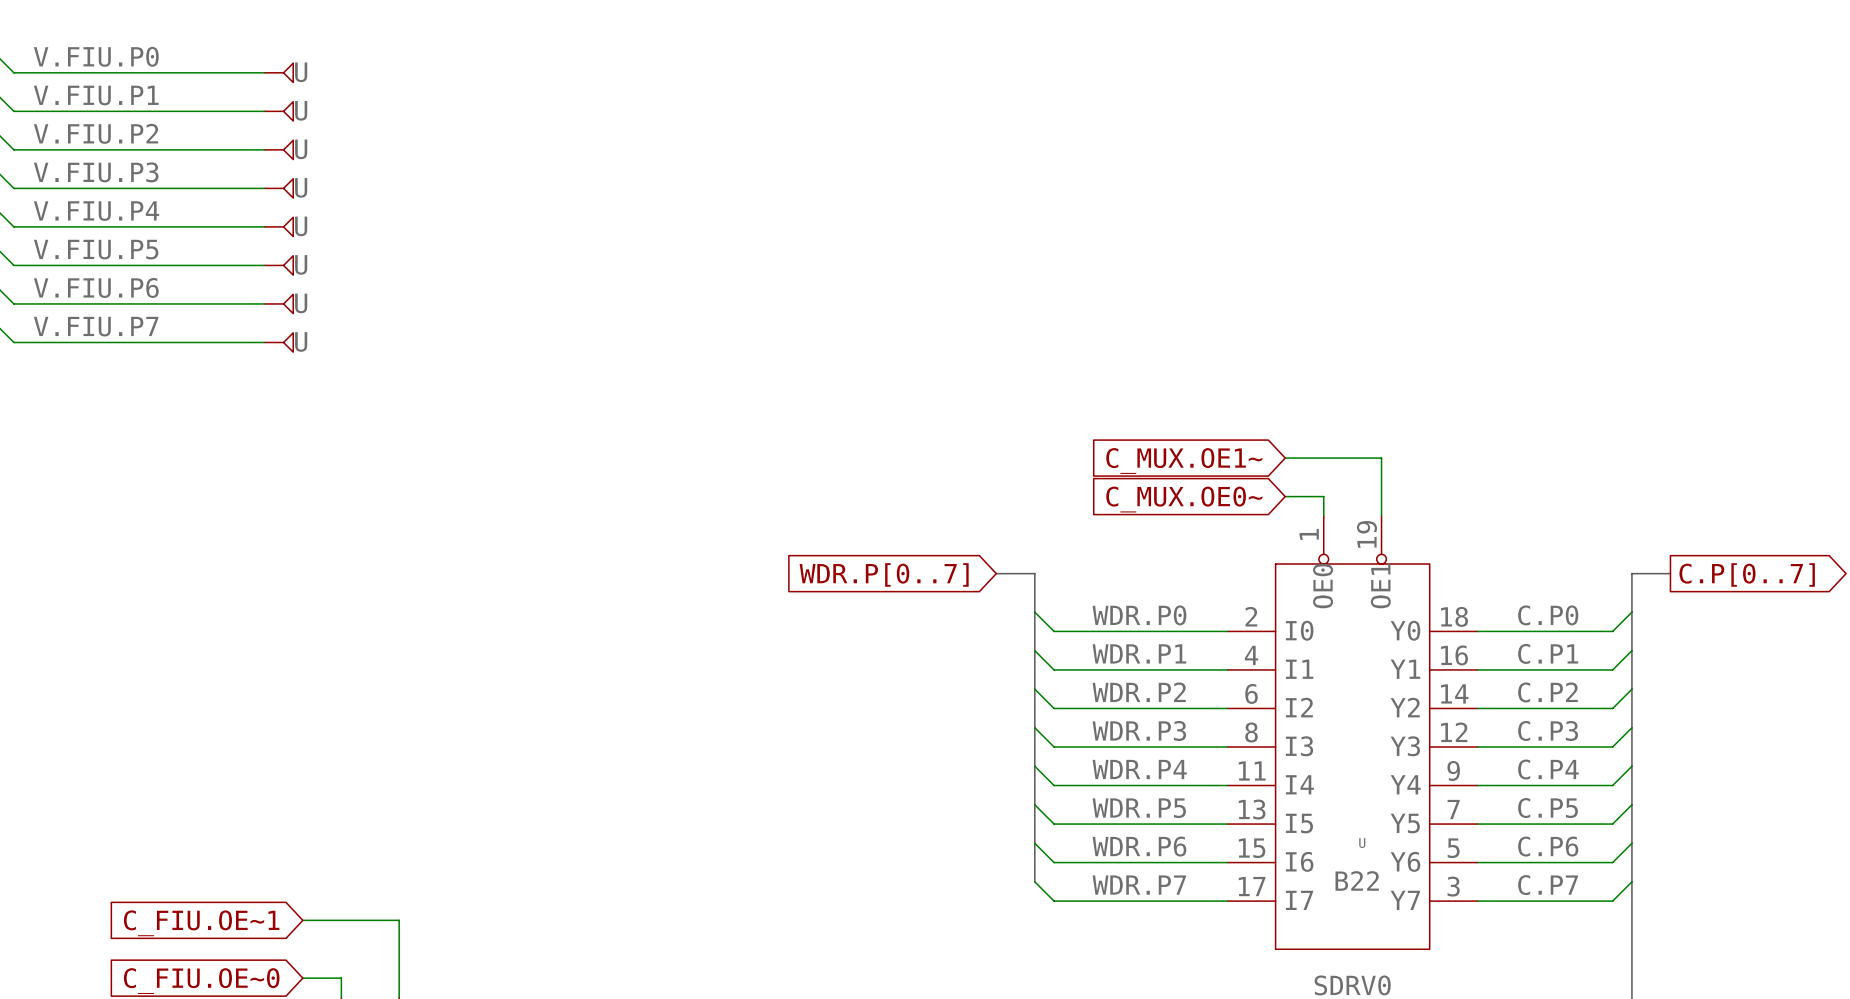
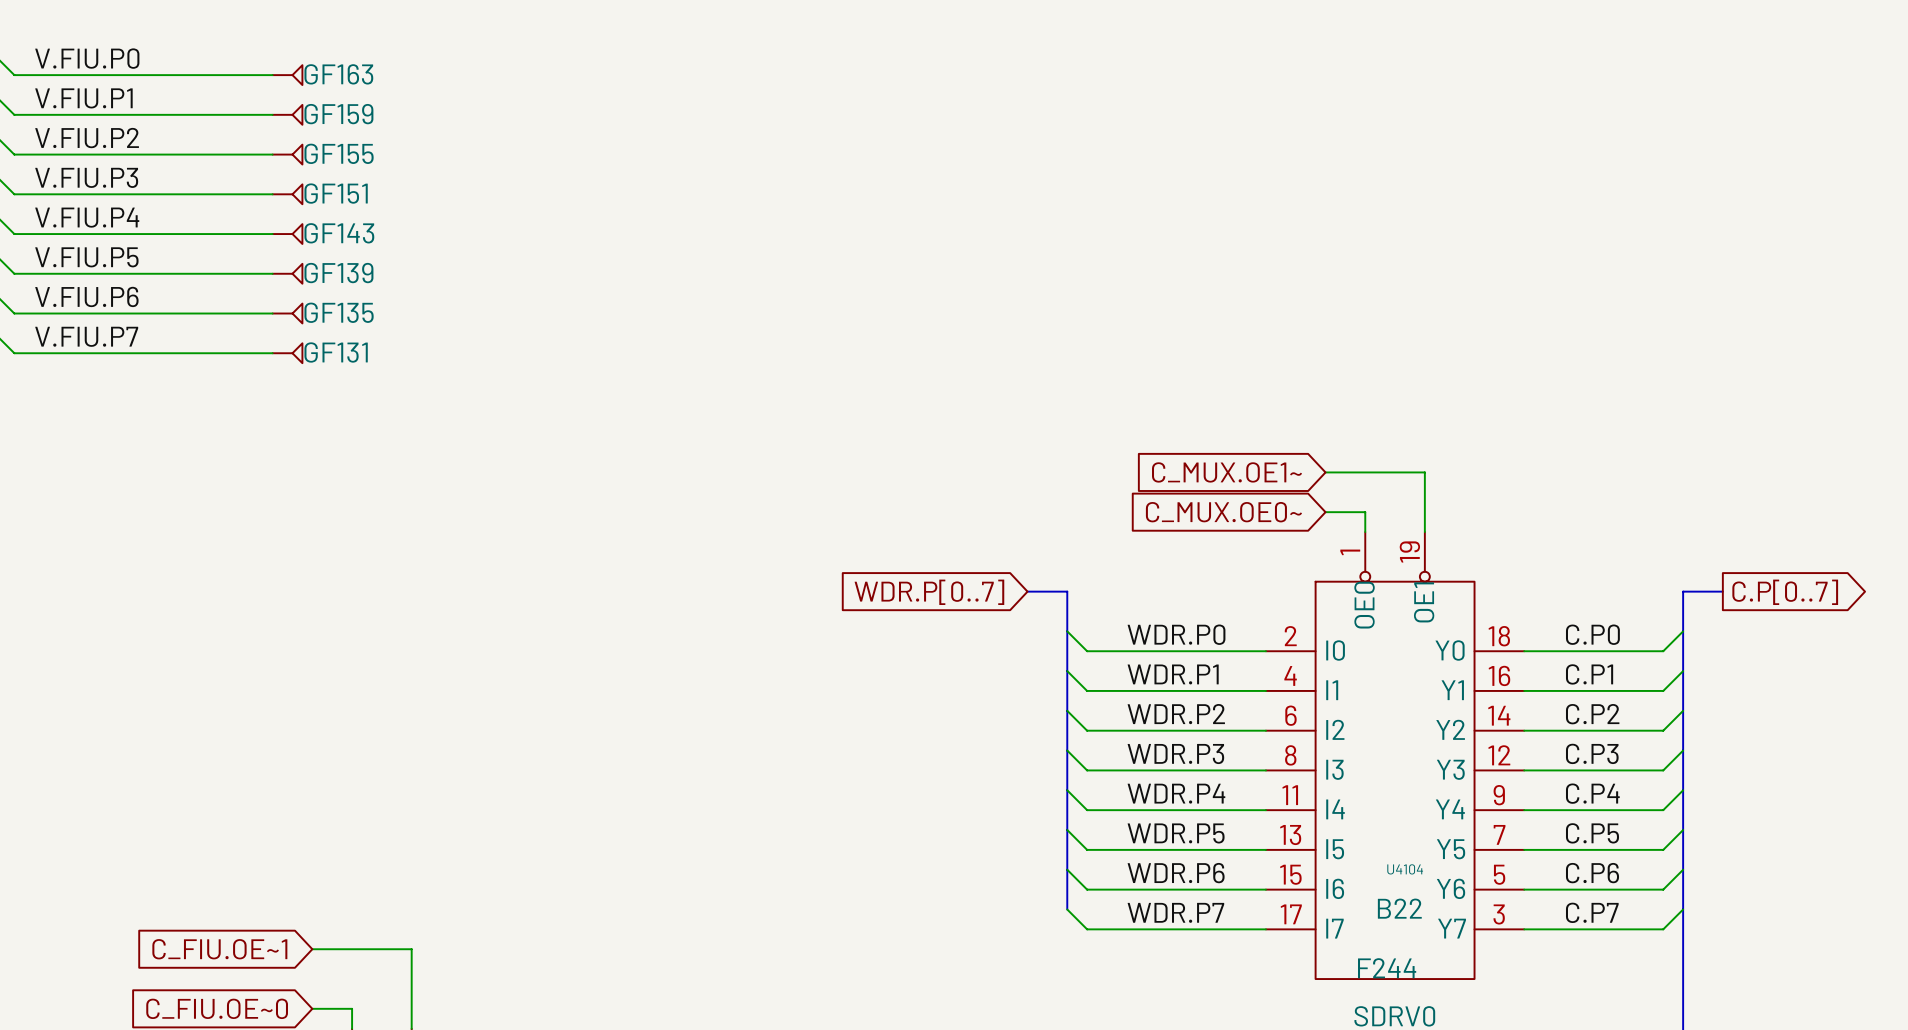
U name: U (301, 72) -> GF163 (338, 74)
U name: U (301, 110) -> GF159 (338, 114)
U name: U (301, 149) -> GF155 (339, 153)
U name: U (301, 187) -> GF151 (336, 193)
U name: U (301, 226) -> GF143 (339, 233)
U name: U (301, 264) -> GF139 (338, 273)
U name: U (301, 303) -> GF135 (339, 312)
U name: U (301, 341) -> GF131 (336, 352)
U name: U (1362, 843) -> U4104 (1405, 869)
U value: none -> F244 (1387, 968)

